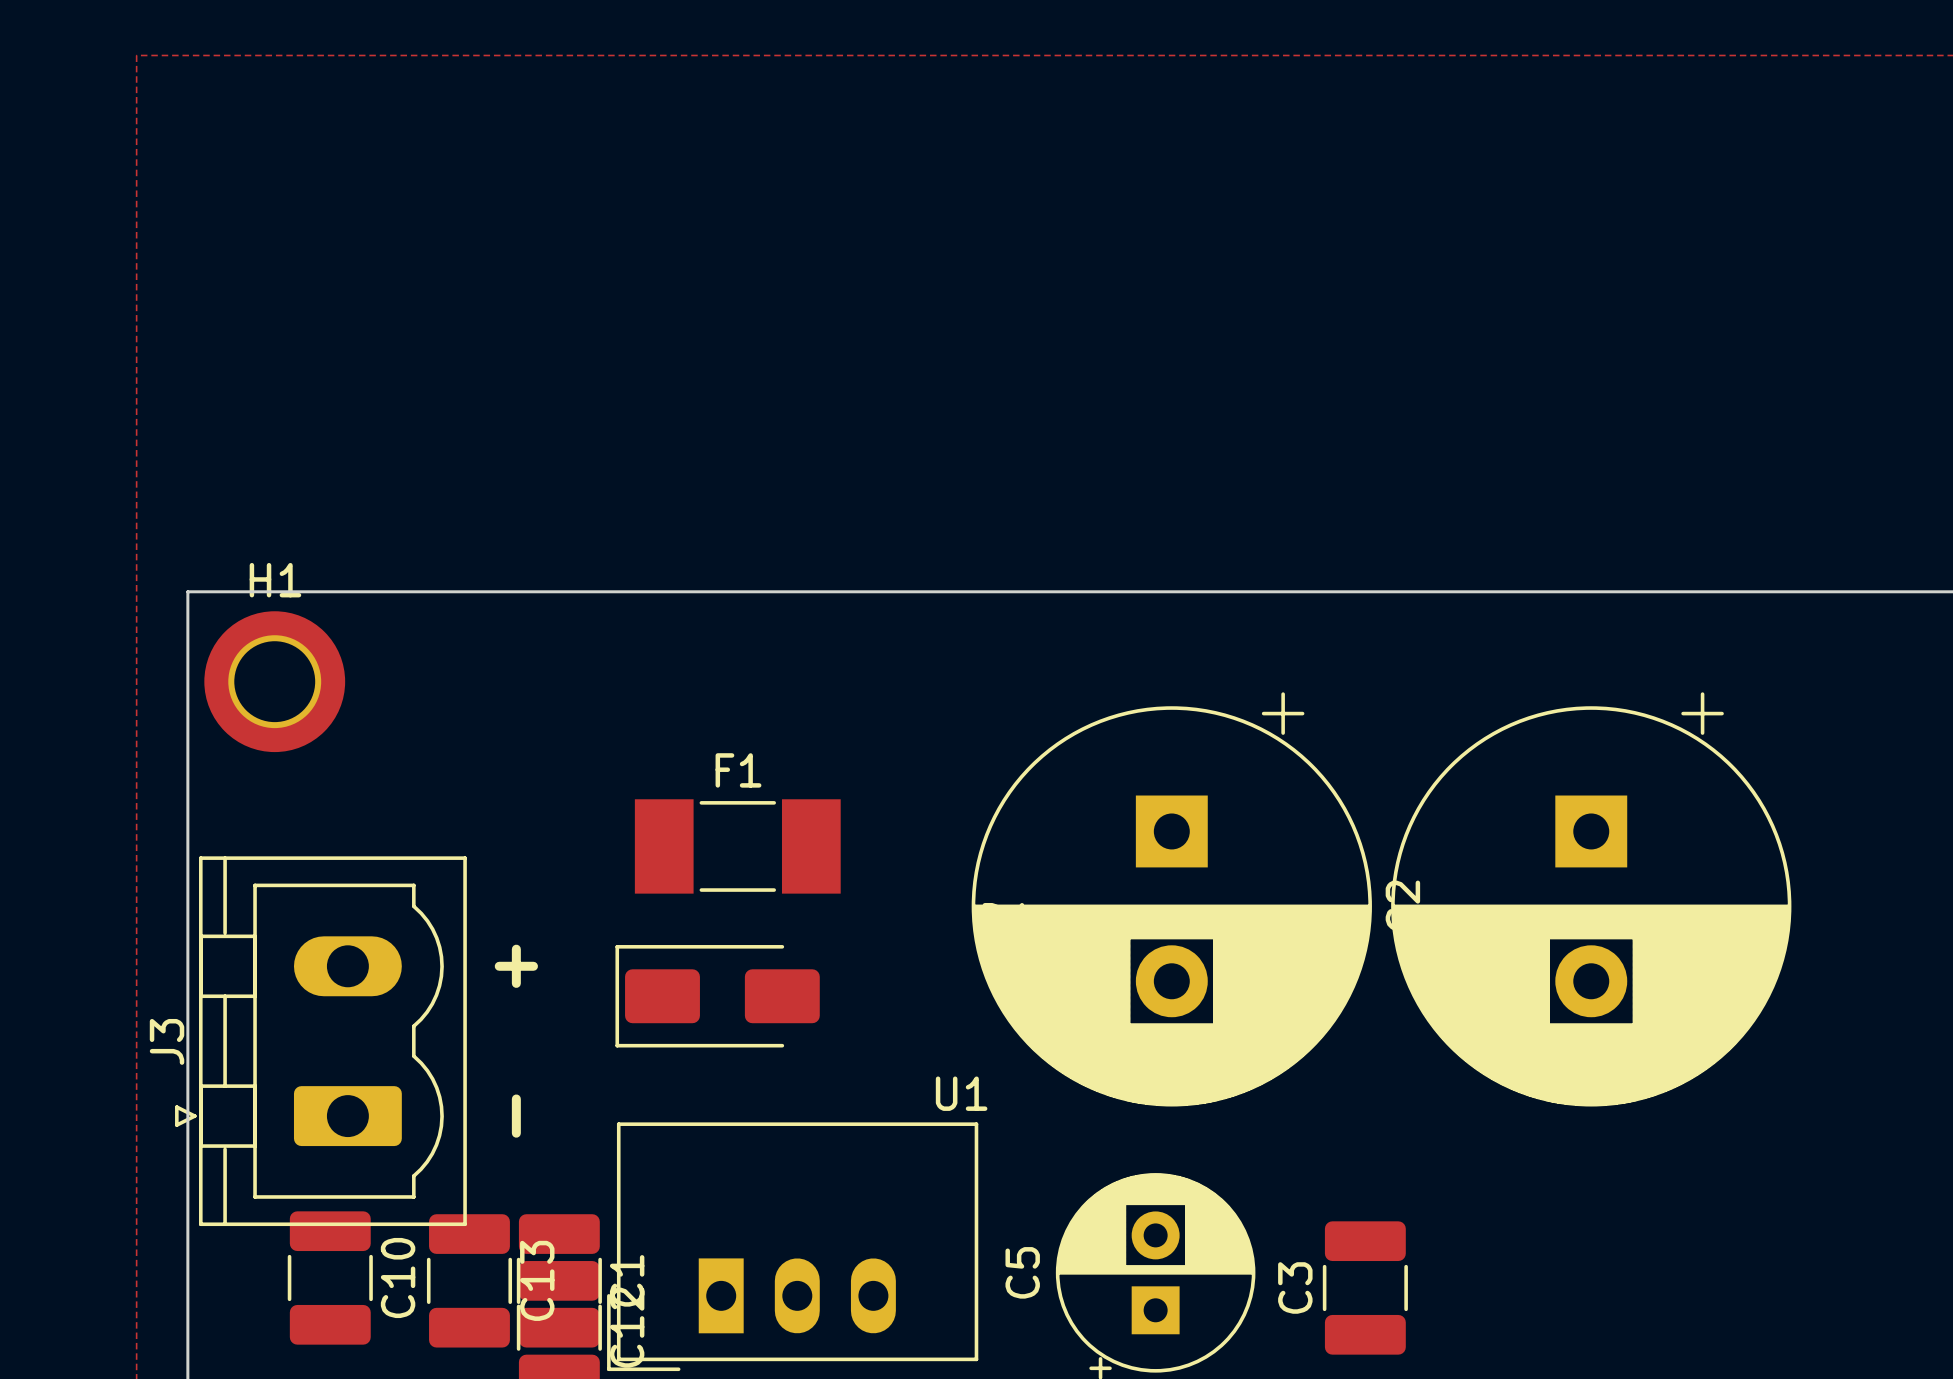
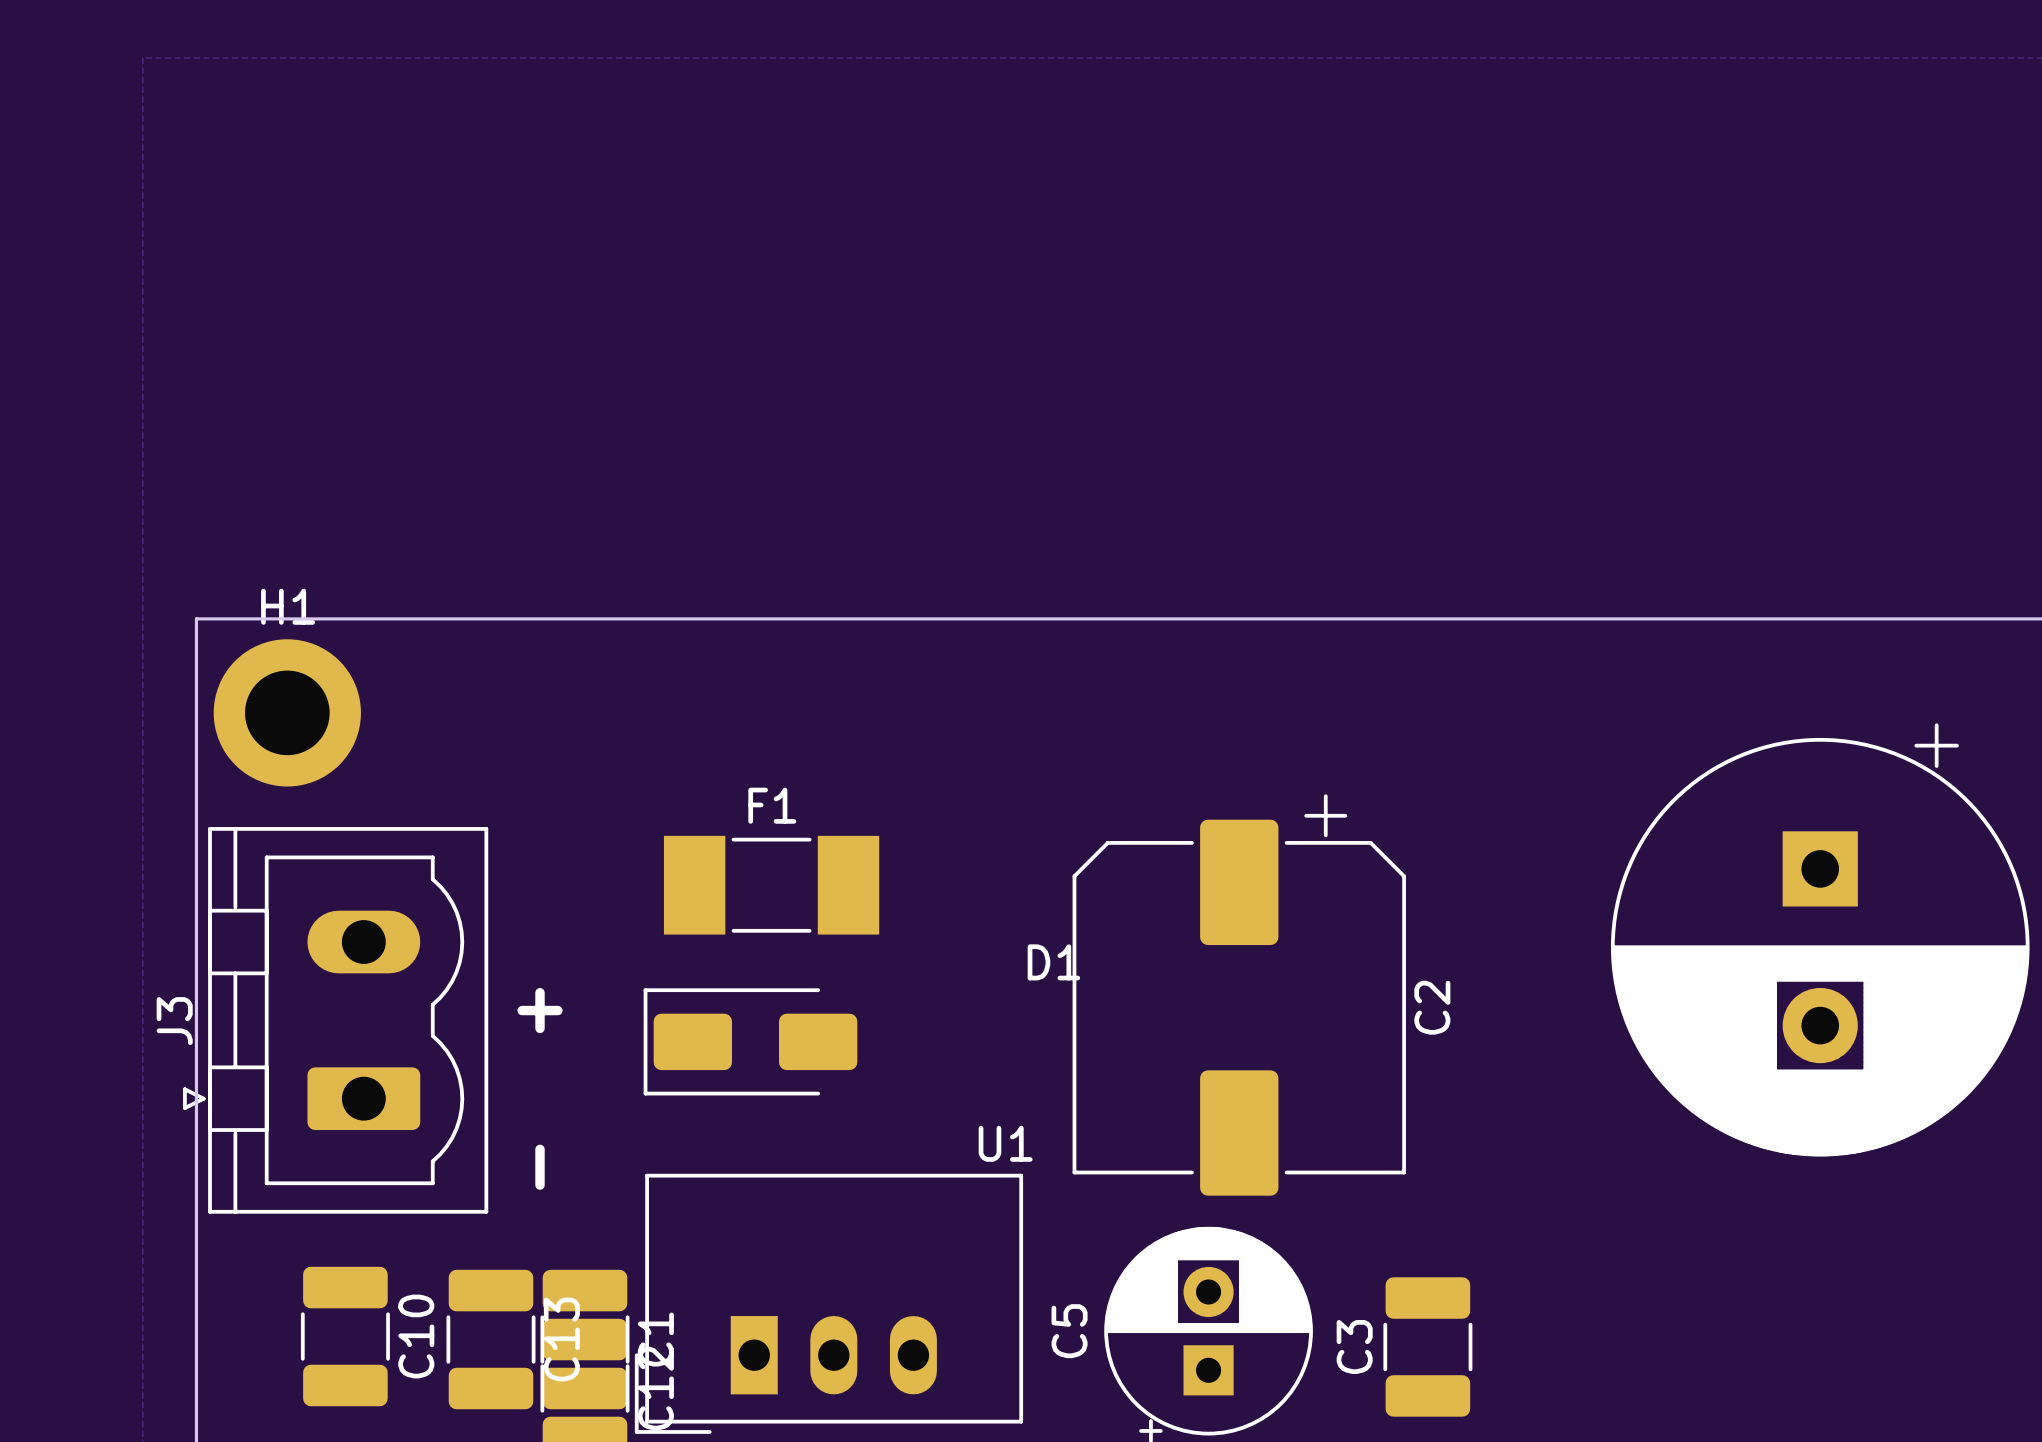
C2 footprint: [971, 692, 1372, 1107] -> [1072, 794, 1406, 1196]
part position: (1591, 899) -> (1820, 939)
J3 position: (320, 1041) -> (335, 1020)

